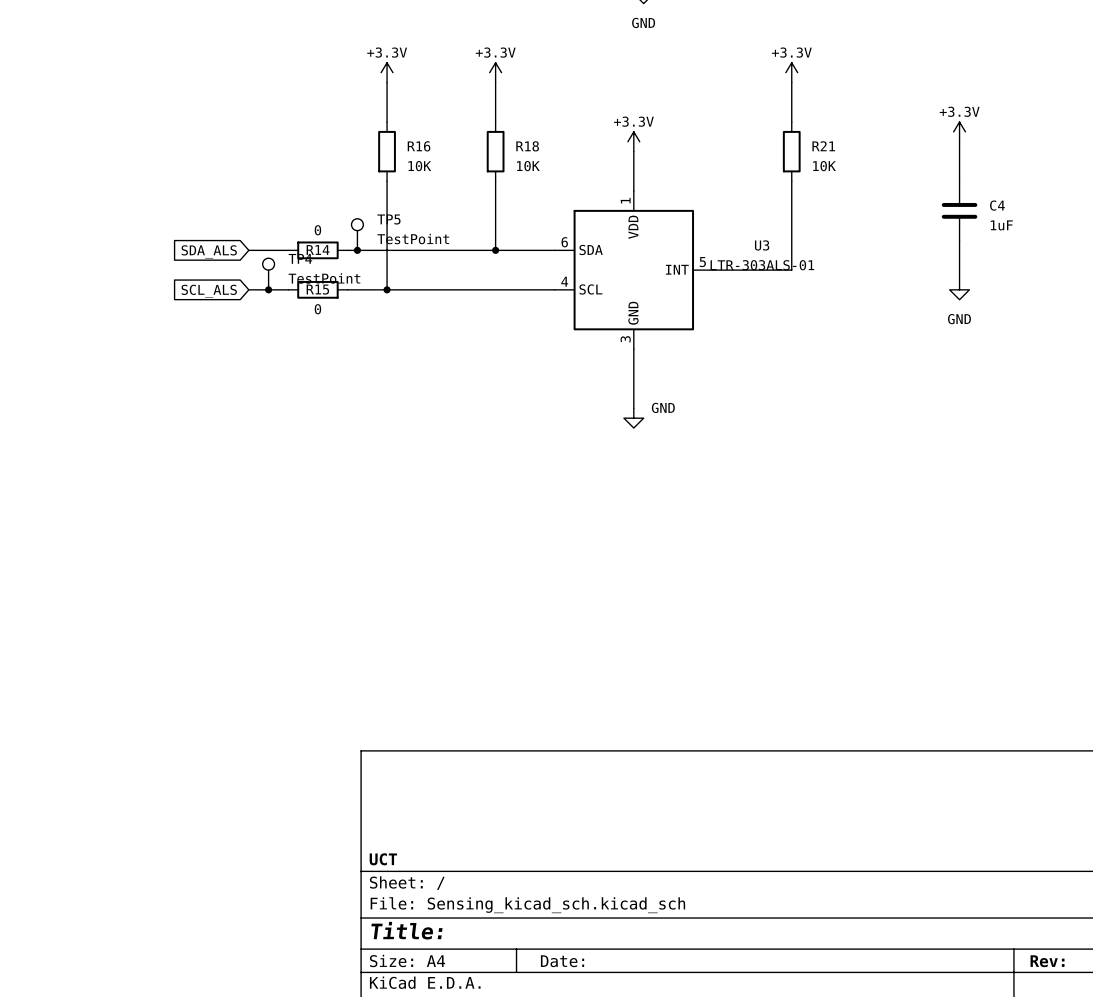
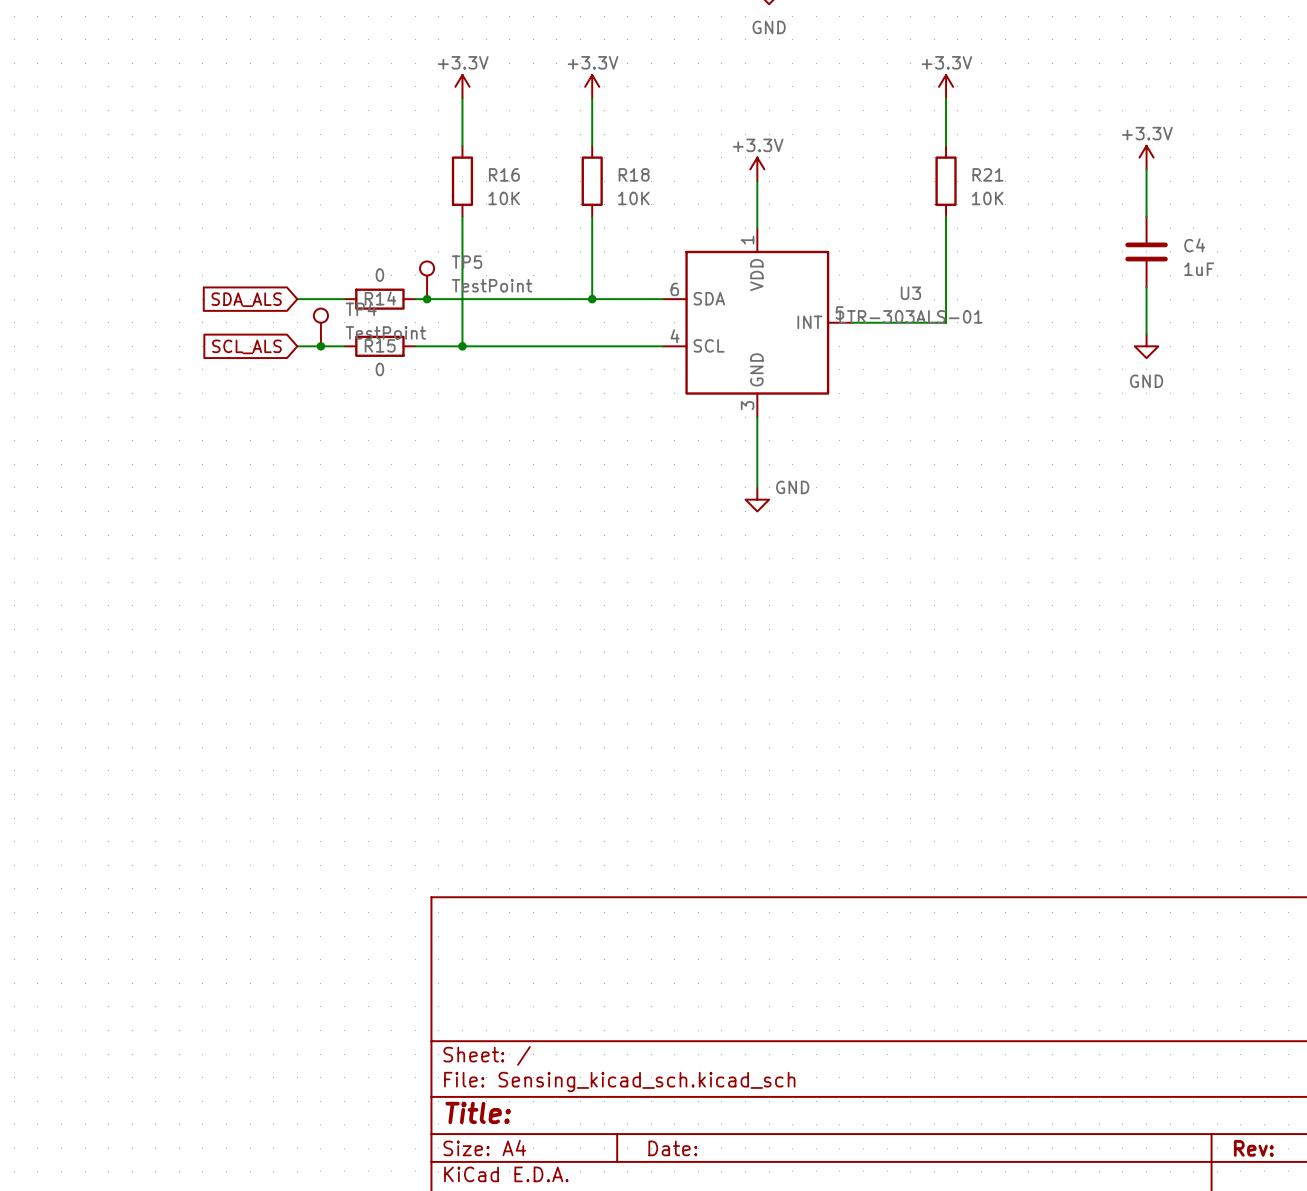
title block: UCT (383, 859) -> none

